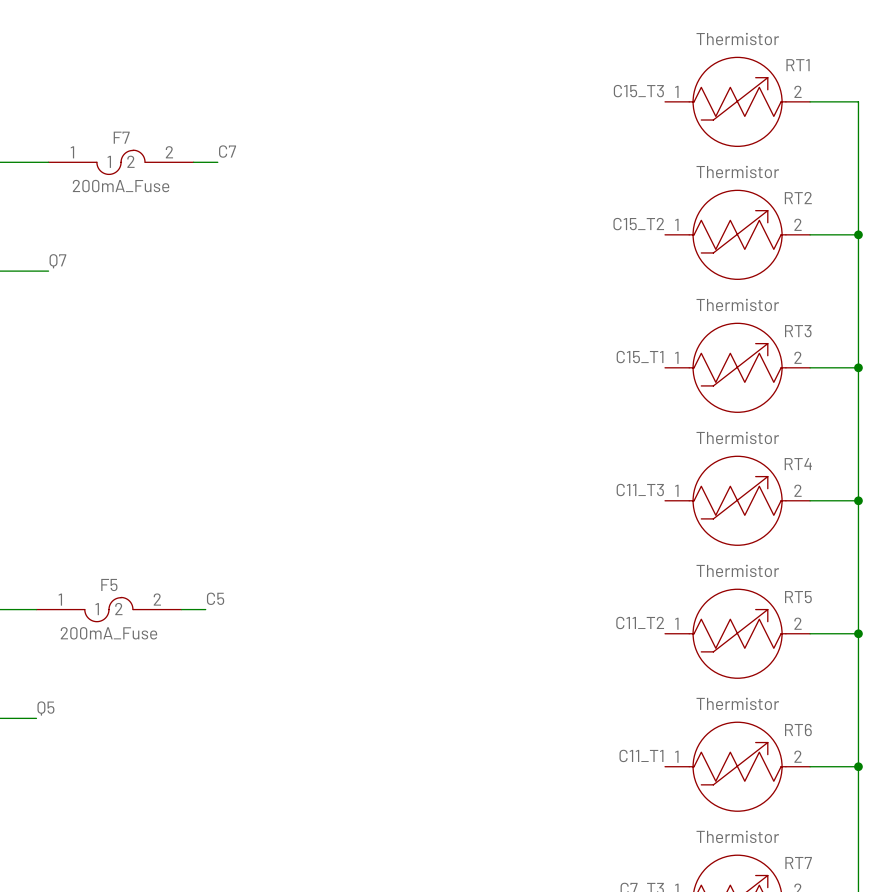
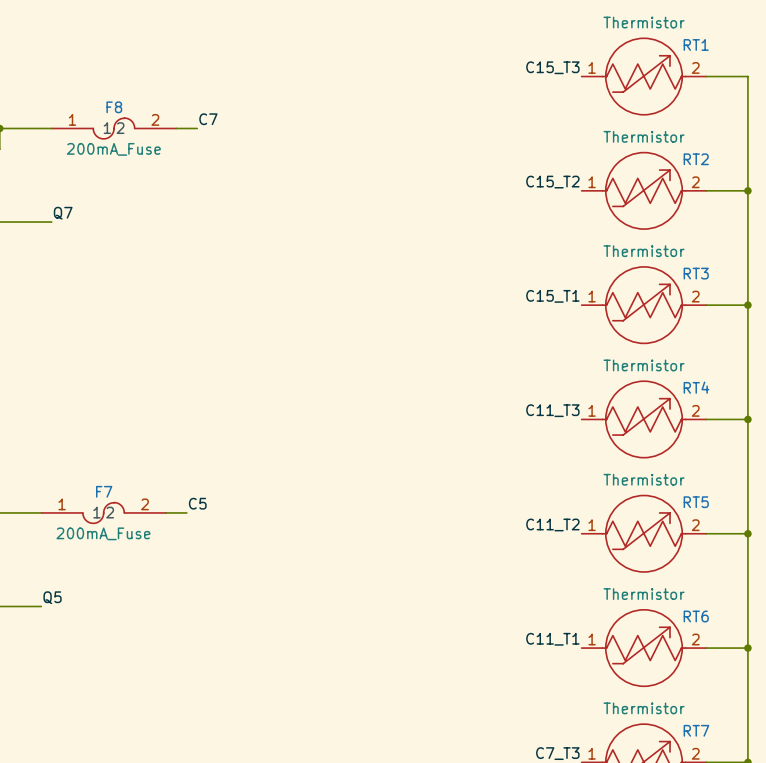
F7 name: F7 (121, 137) -> F8 (114, 107)
F5 name: F5 (109, 585) -> F7 (104, 491)

